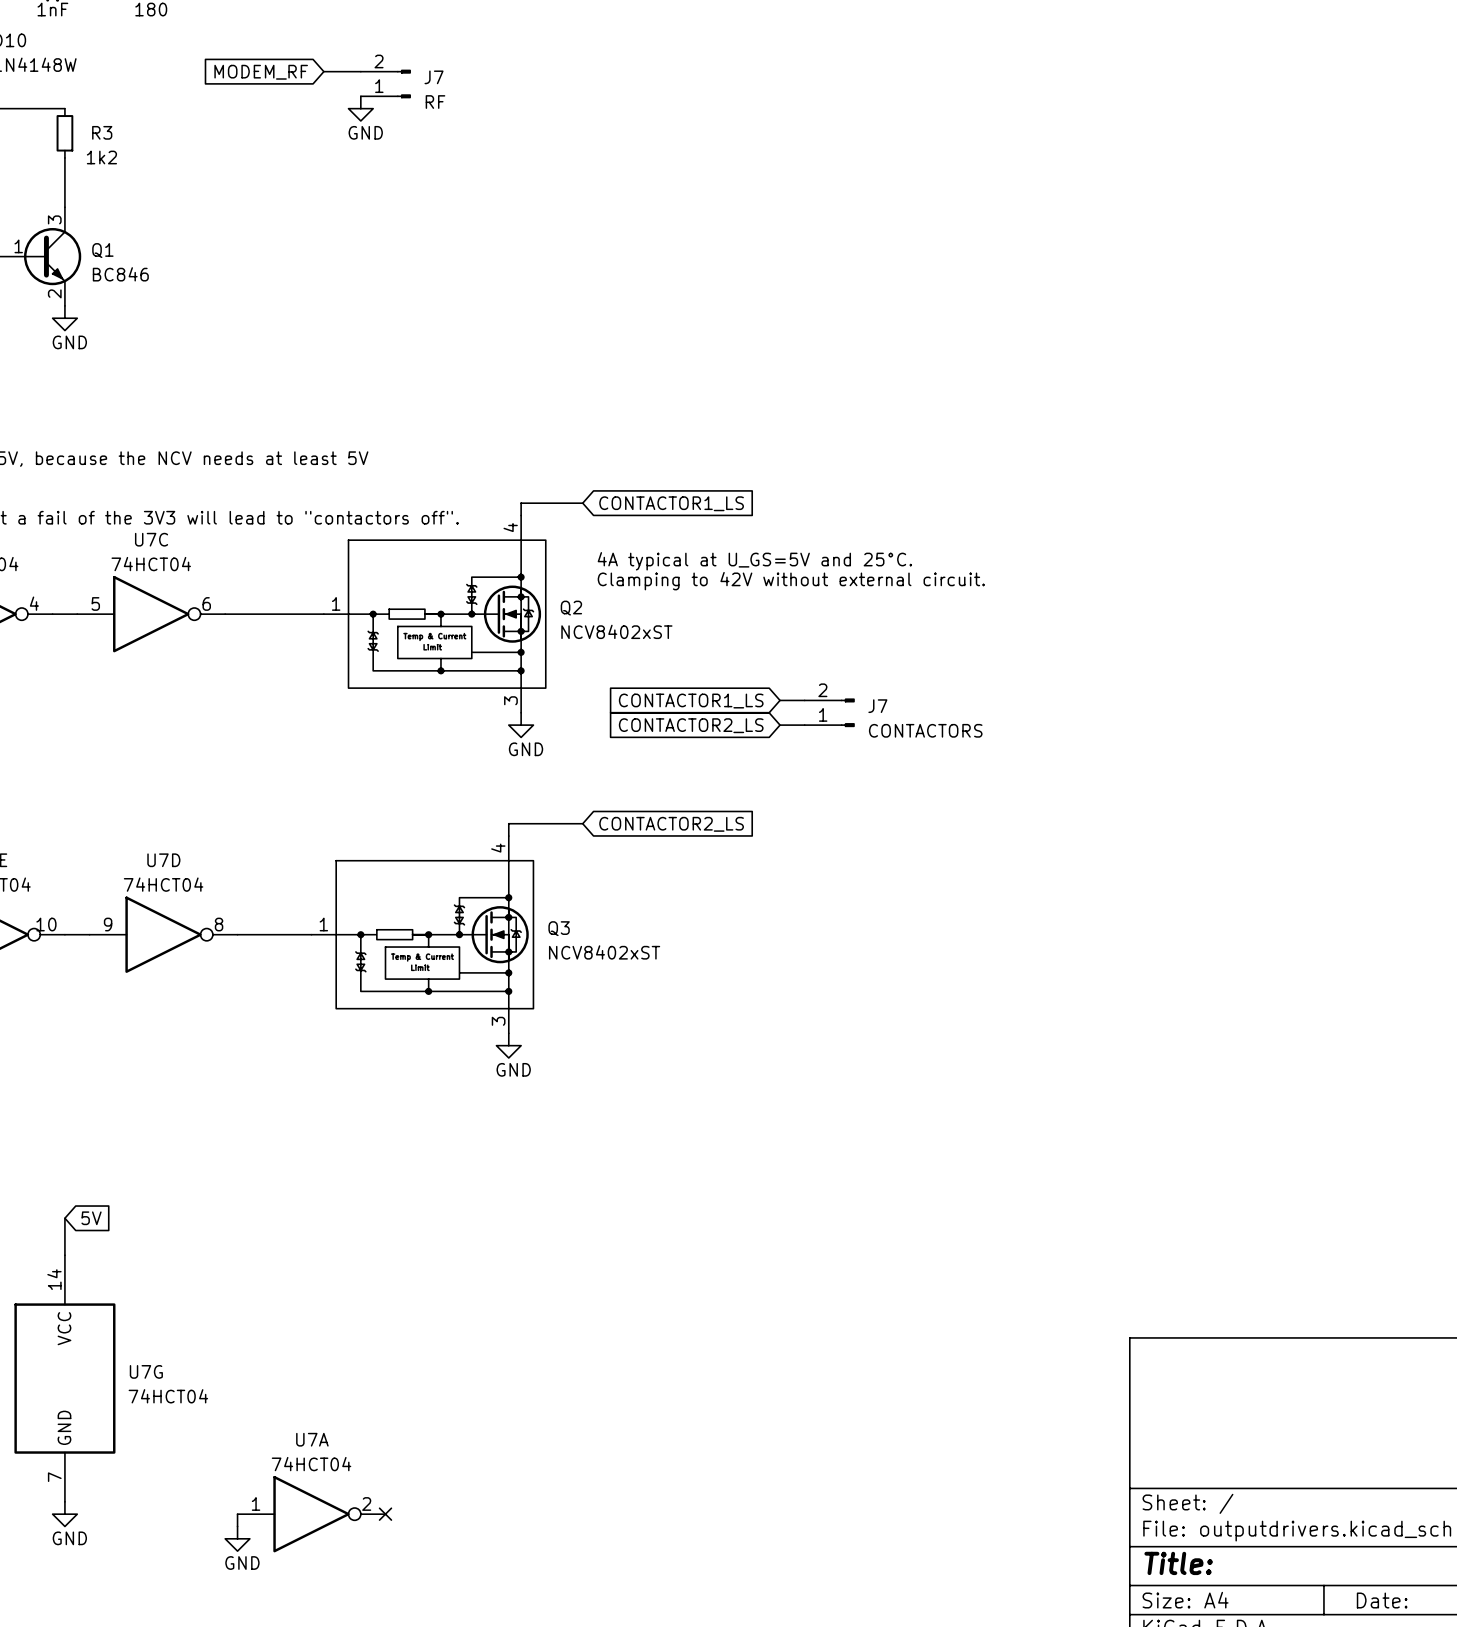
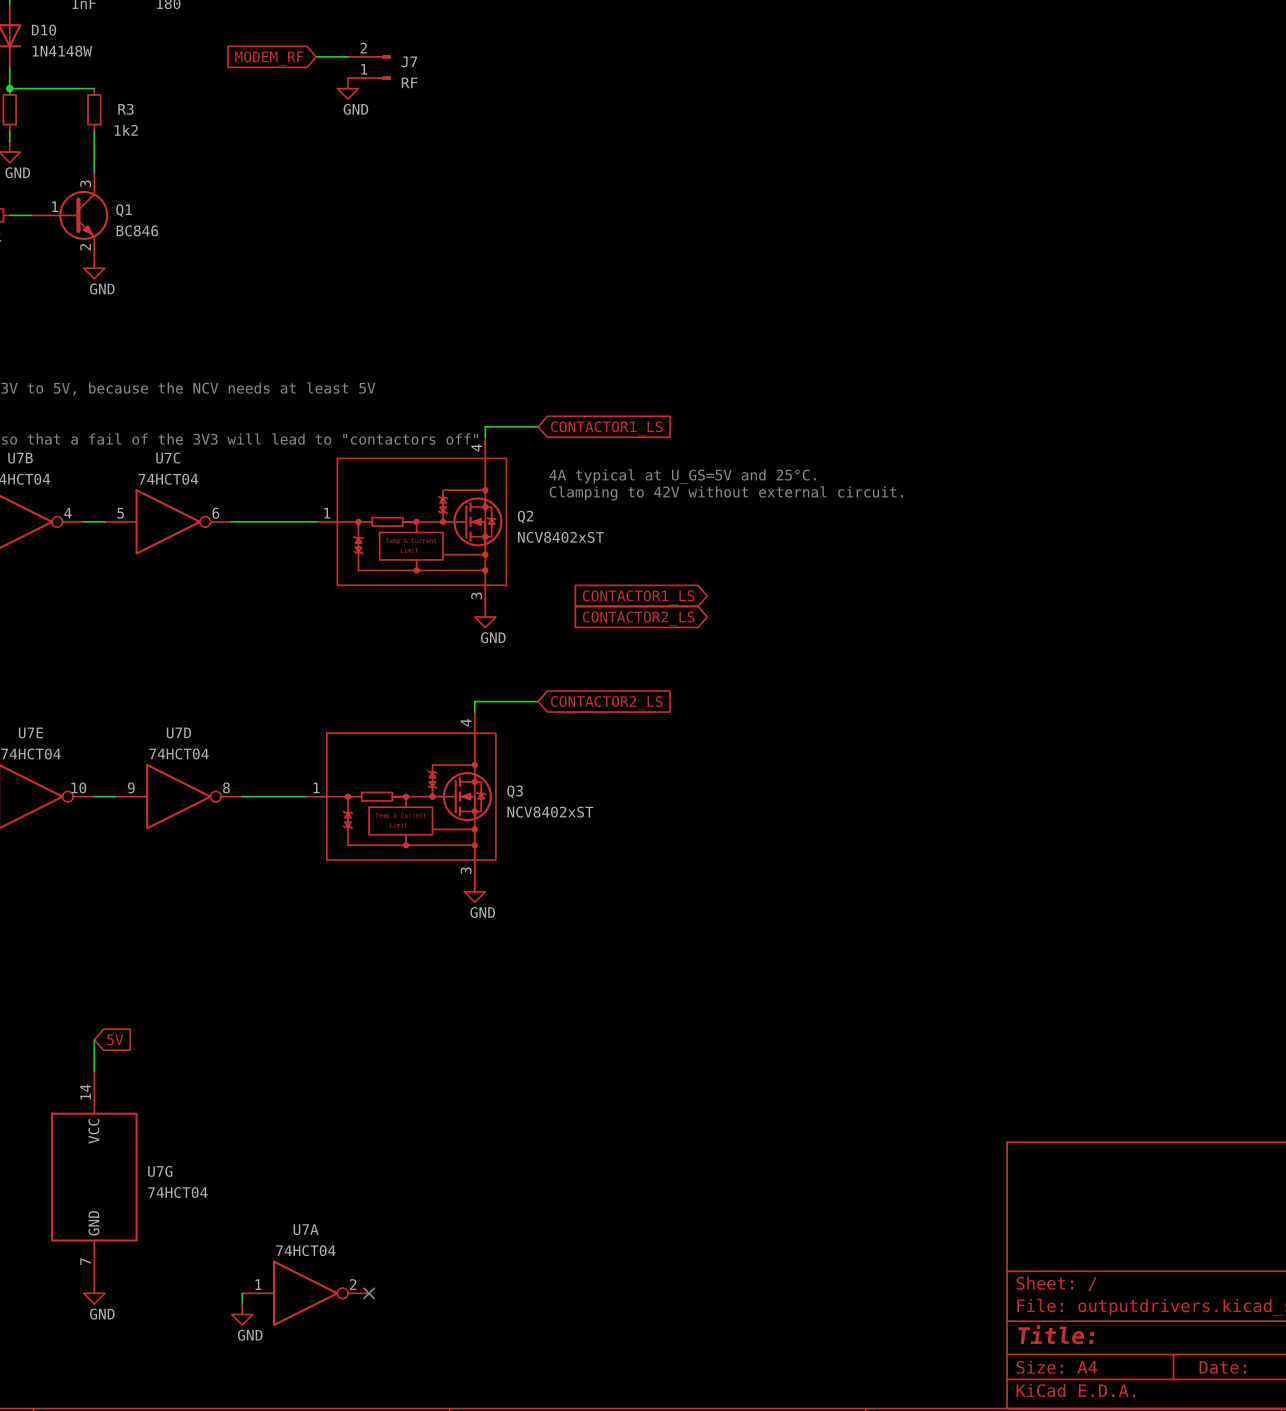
wire: (780, 700) (804, 700) -> none
J7: CONTACTORS (829, 712) -> none
wire: (780, 725) (804, 725) -> none

